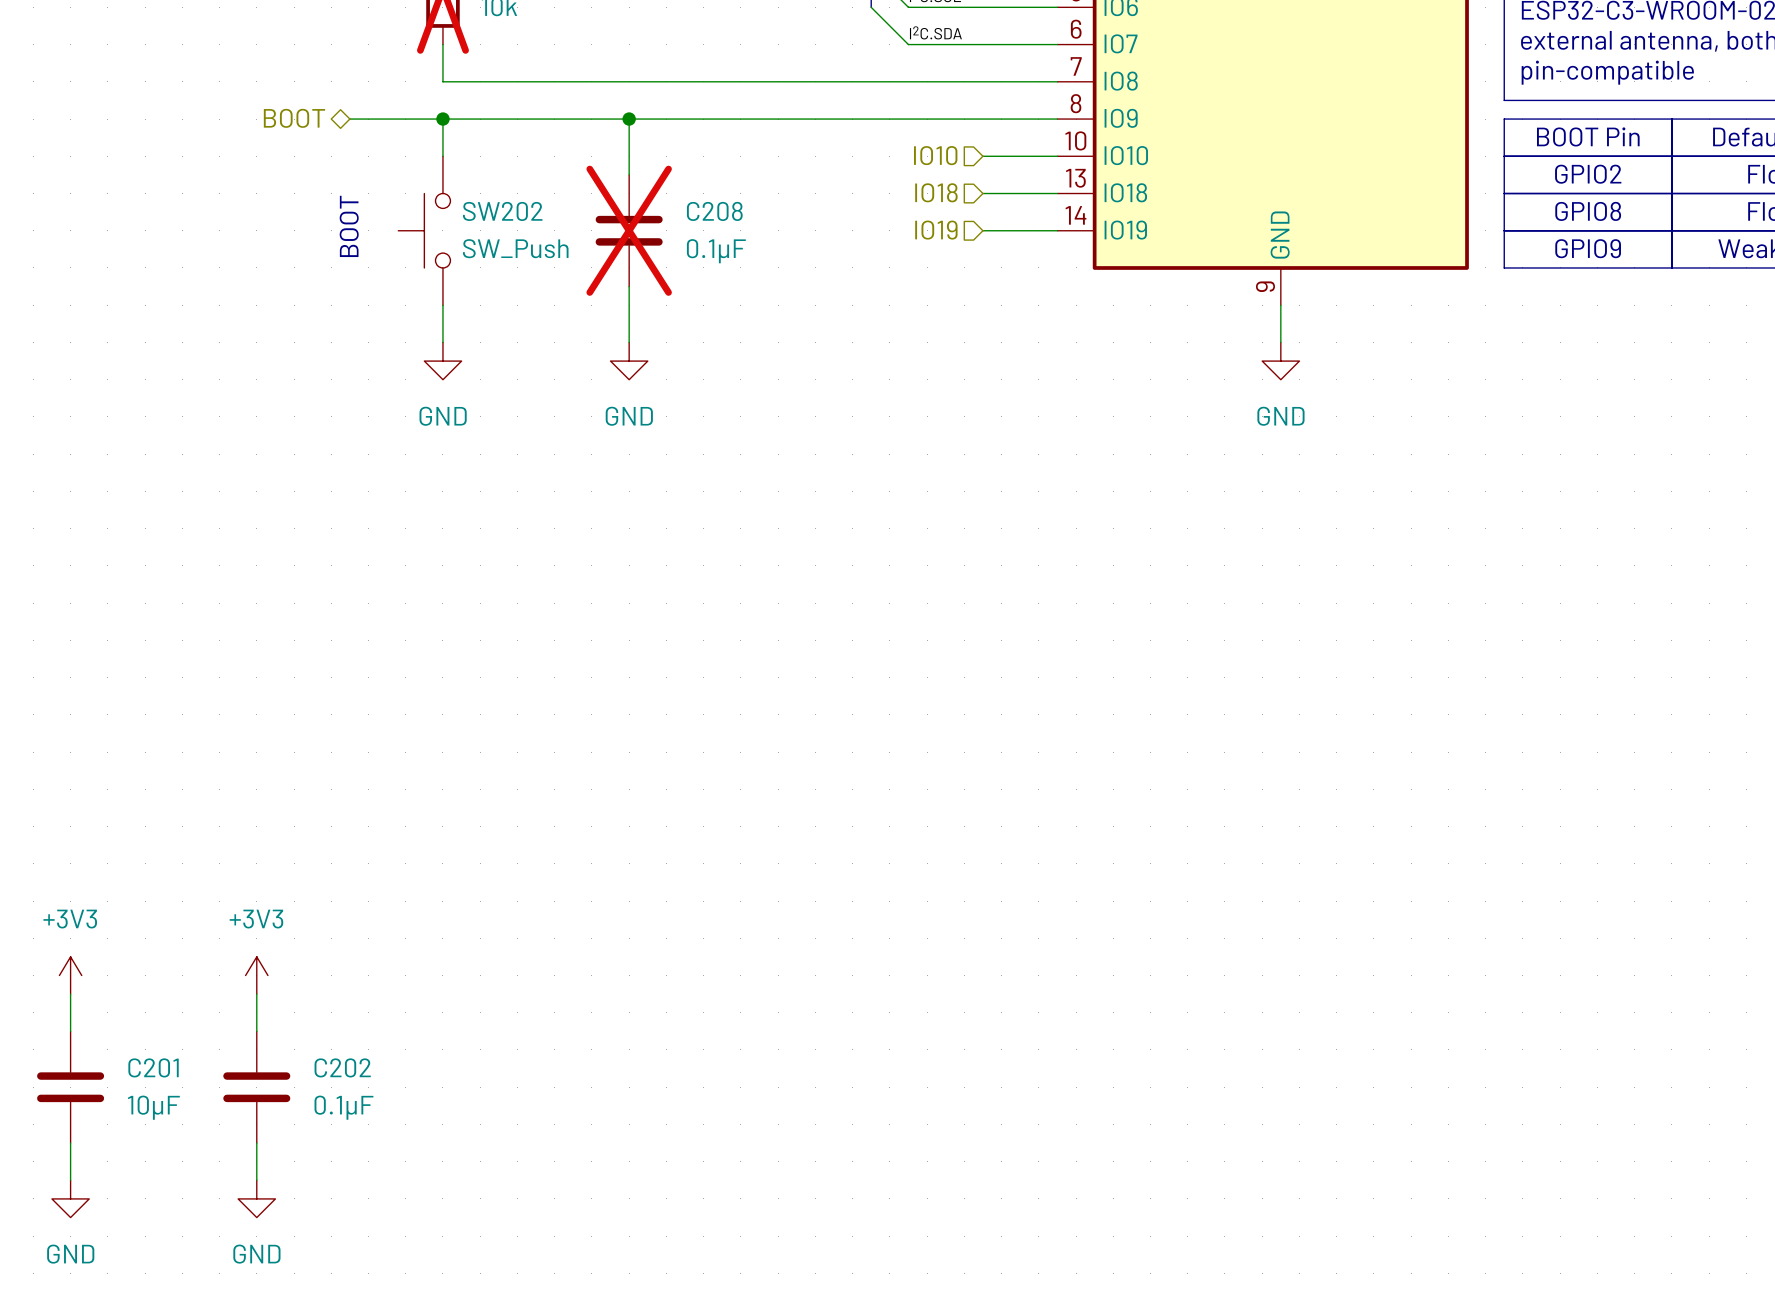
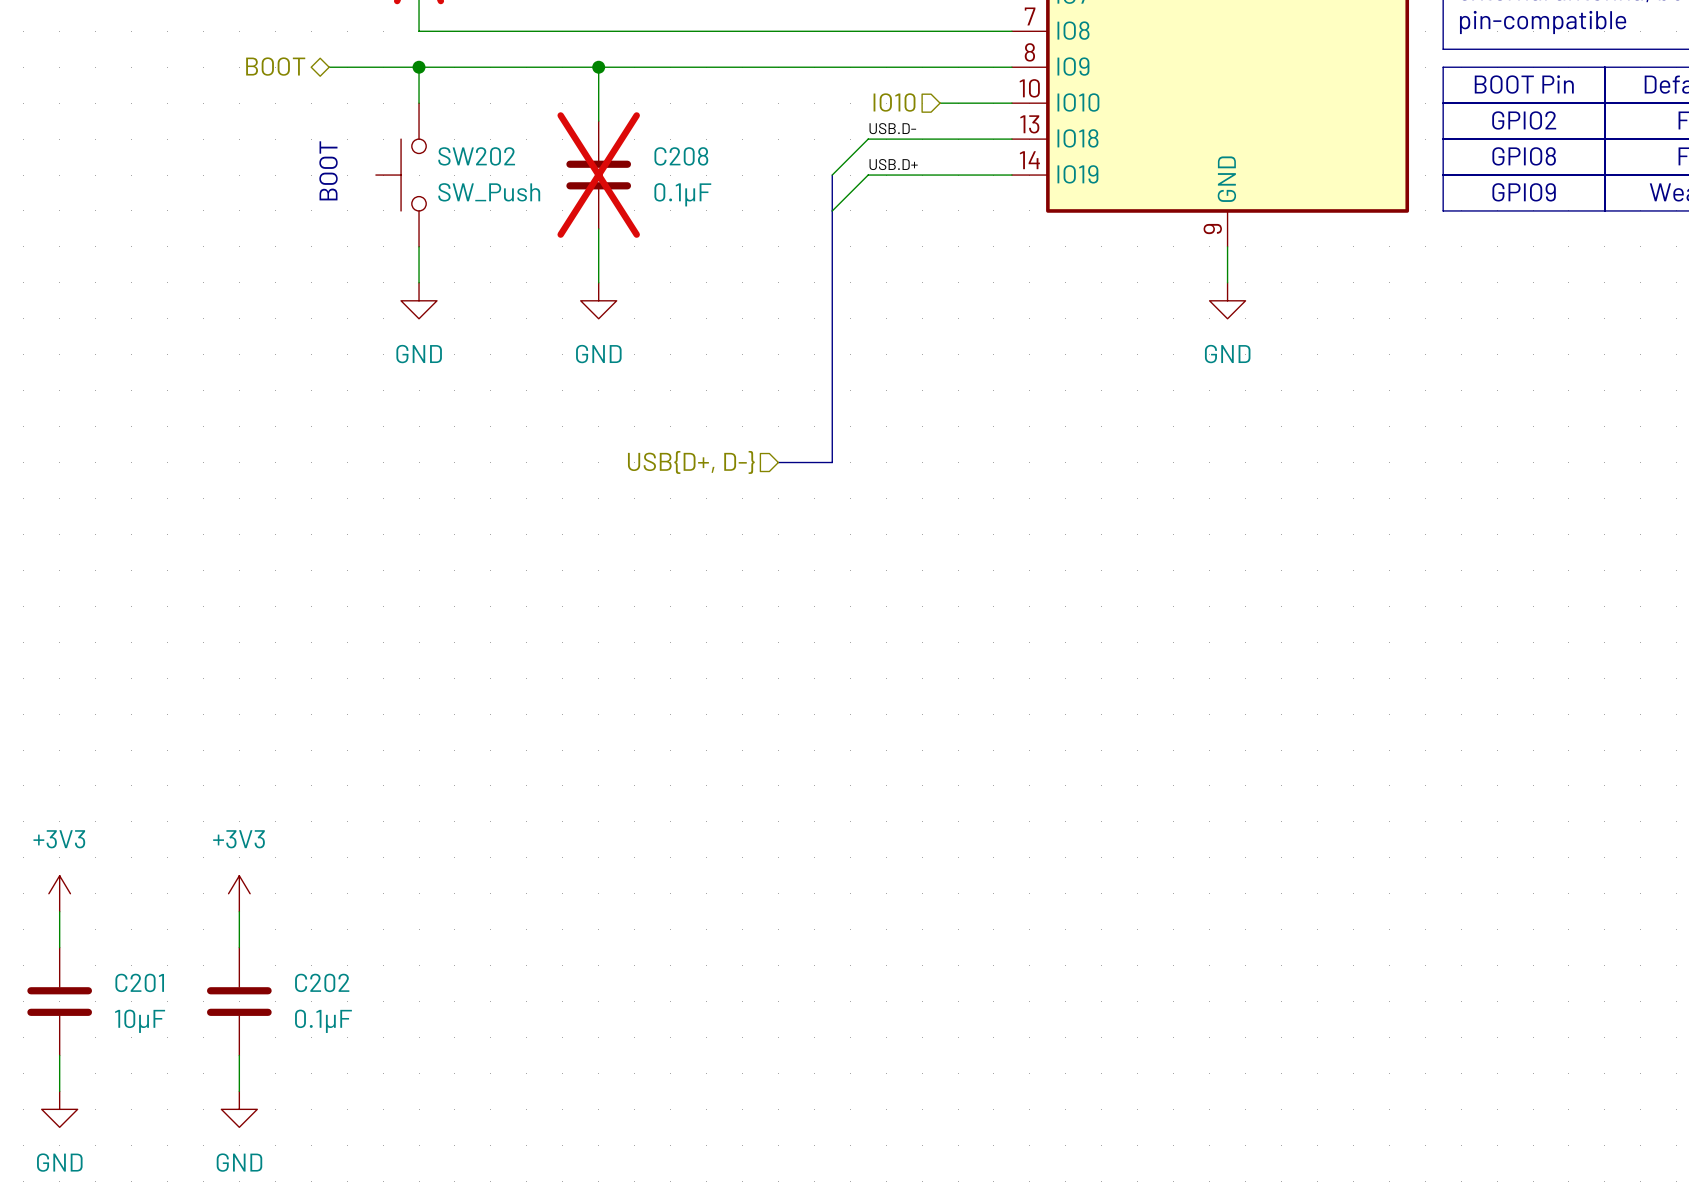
label: none -> USB.D- (892, 128)
hierarchical label: IO18 (936, 192) -> none
wire: none -> (940, 139) (868, 139) (832, 175)
label: none -> USB.D+ (893, 164)
bus: none -> (832, 175) (832, 462) (778, 462)
hierarchical label: IO19 (936, 230) -> none
wire: none -> (940, 175) (868, 175) (832, 210)
hierarchical label: none -> USB{D+, D-} (691, 462)

